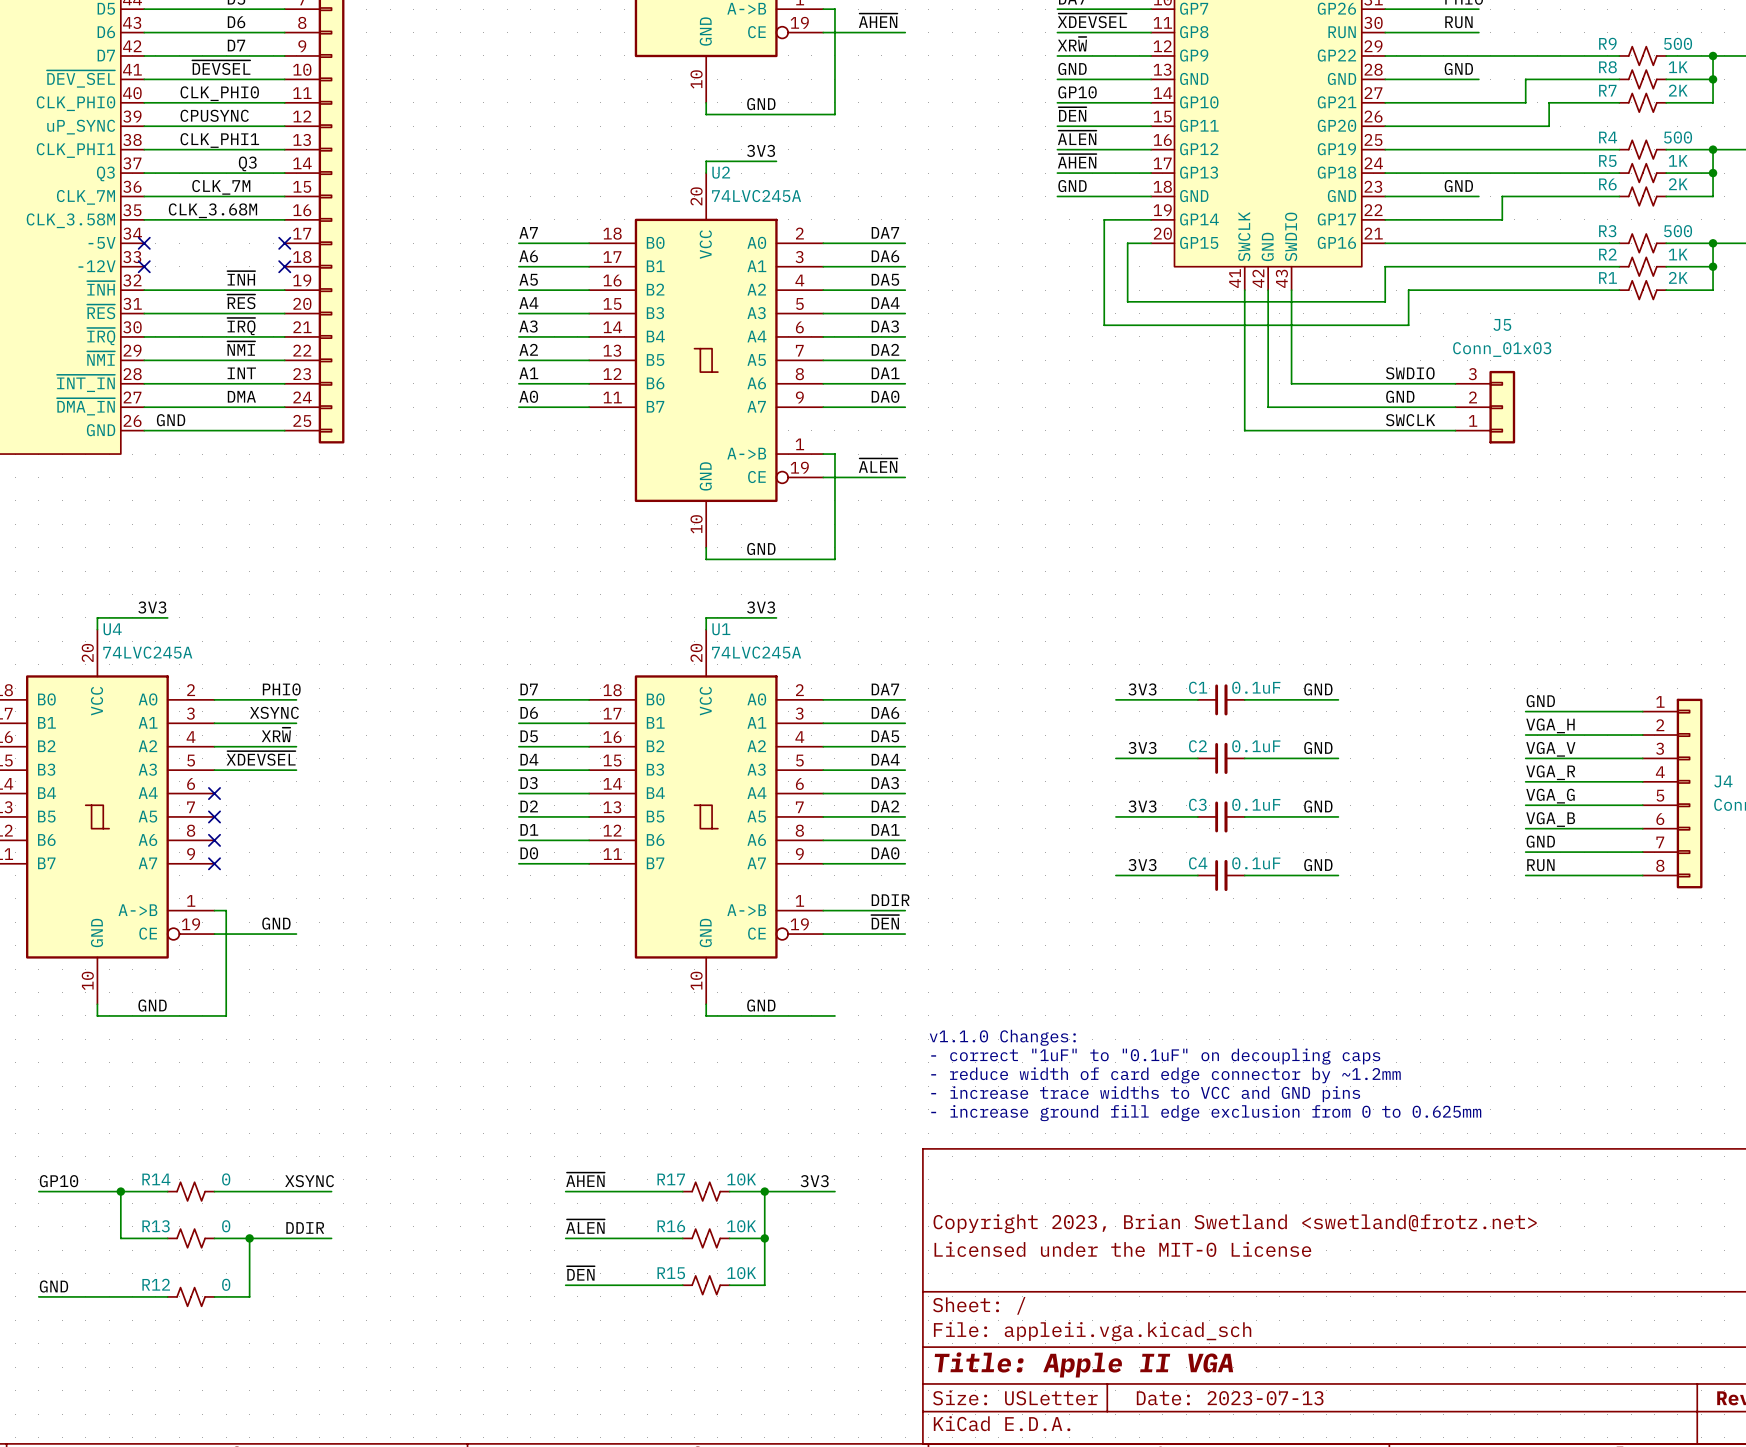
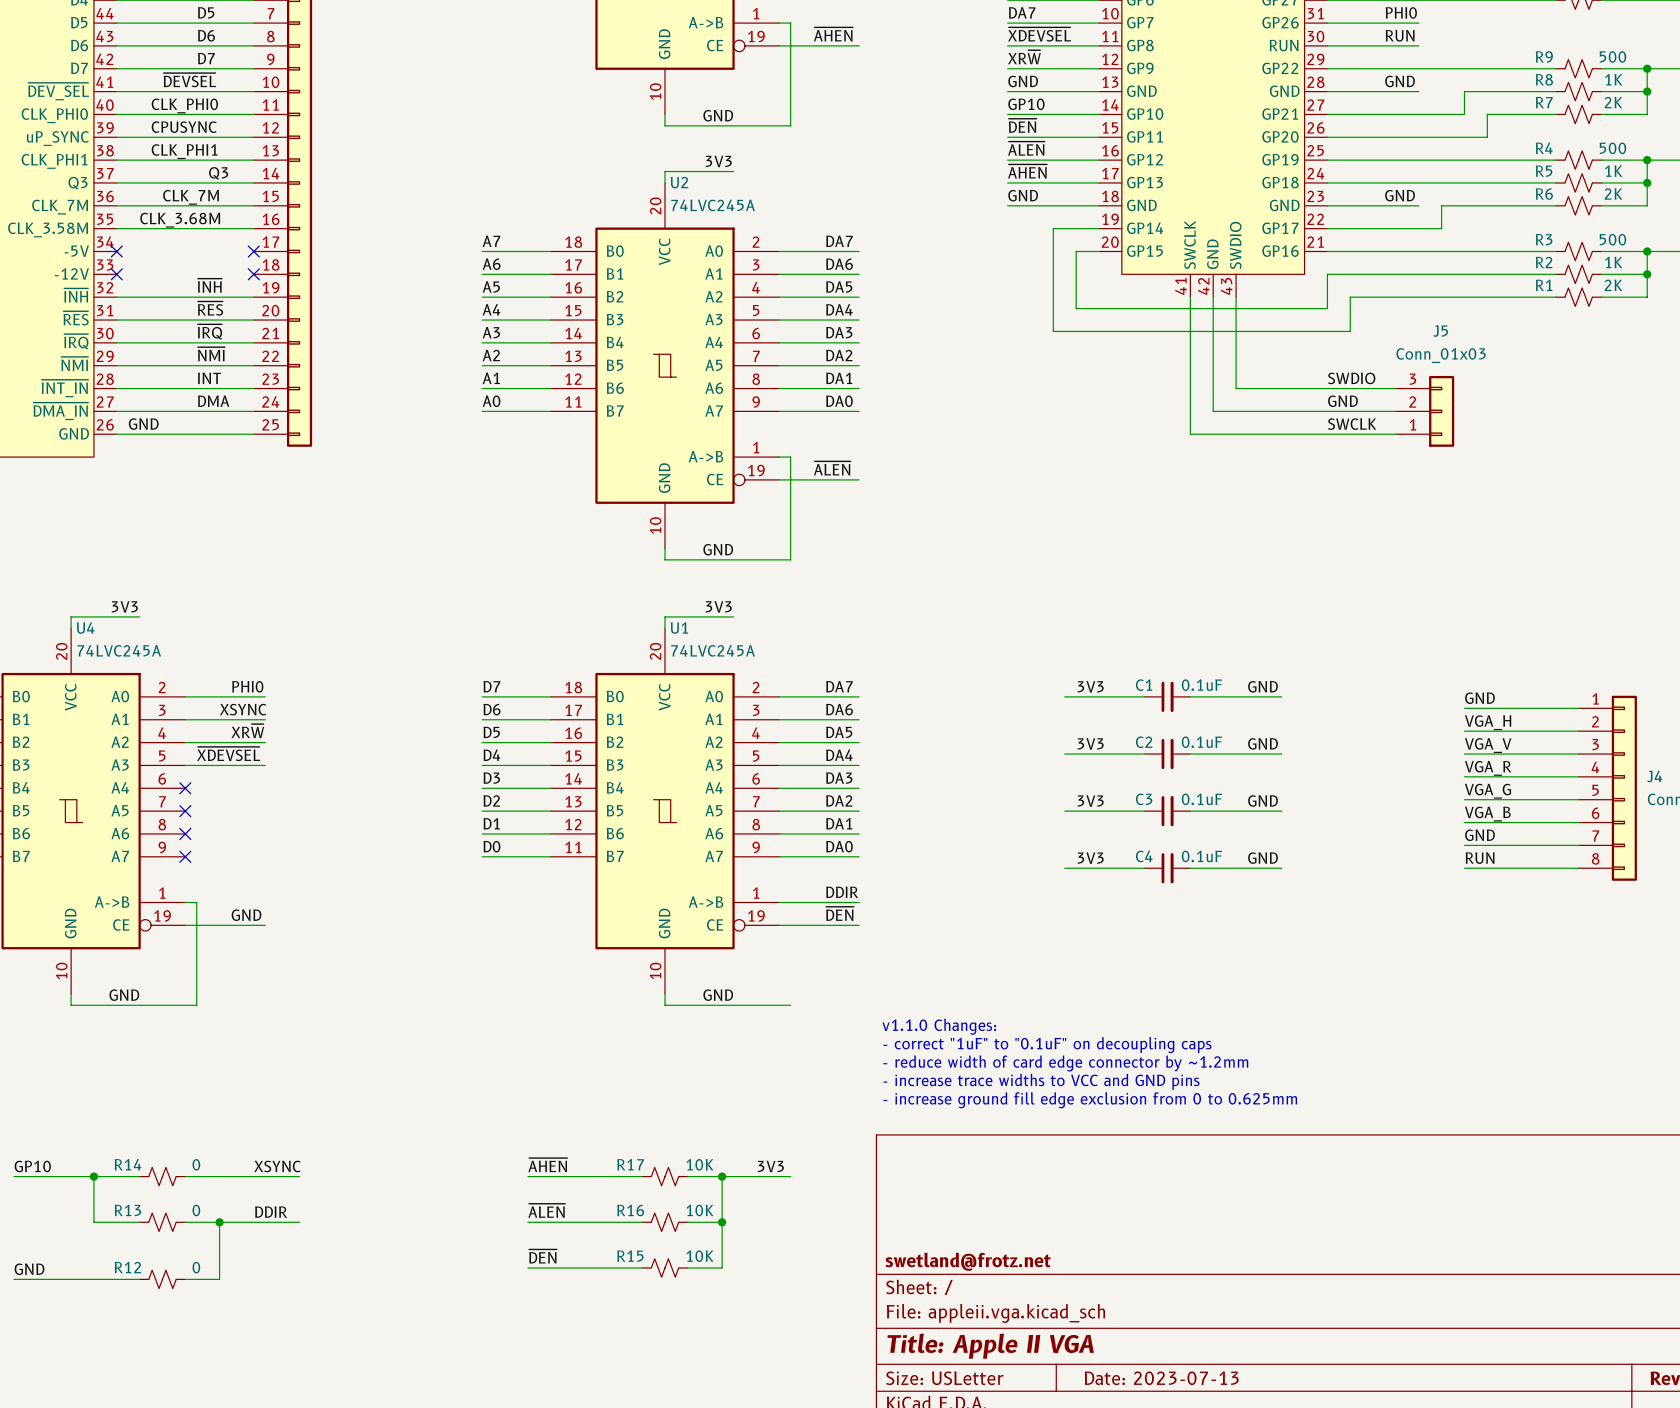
title block: Copyright 2023, Brian Swetland <swetland@frotz.net> (1235, 1223) -> none
title block: Licensed under the MIT-0 License (1122, 1249) -> none
title block: none -> swetland@frotz.net (968, 1261)

